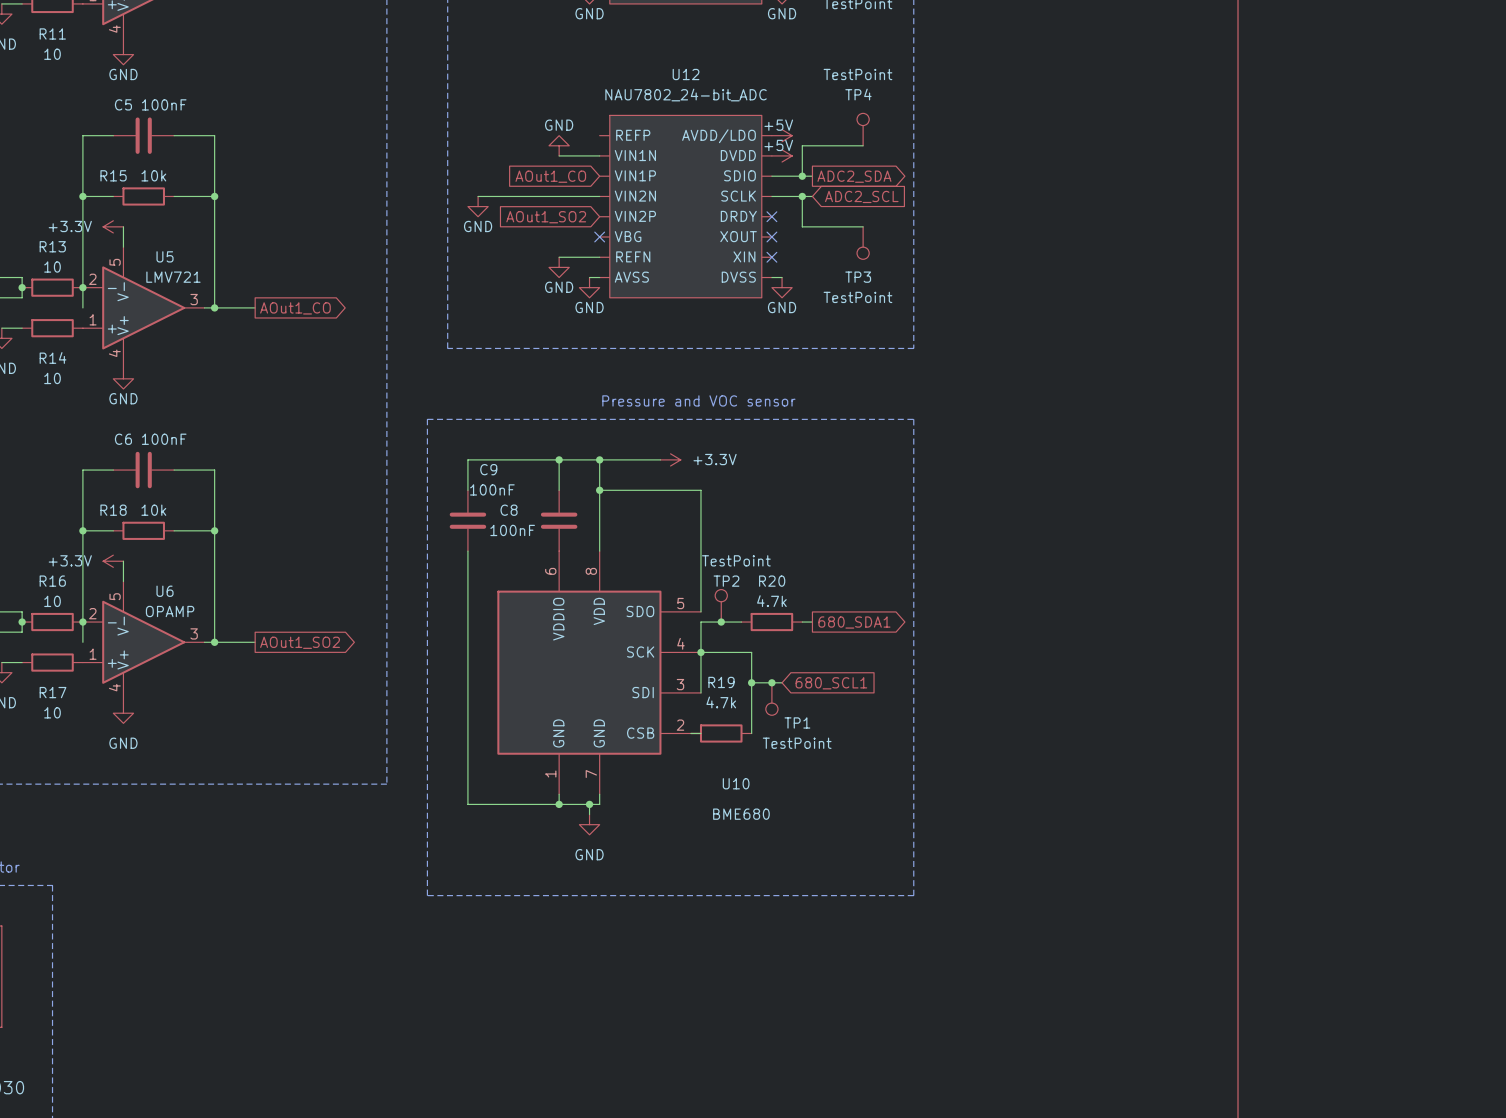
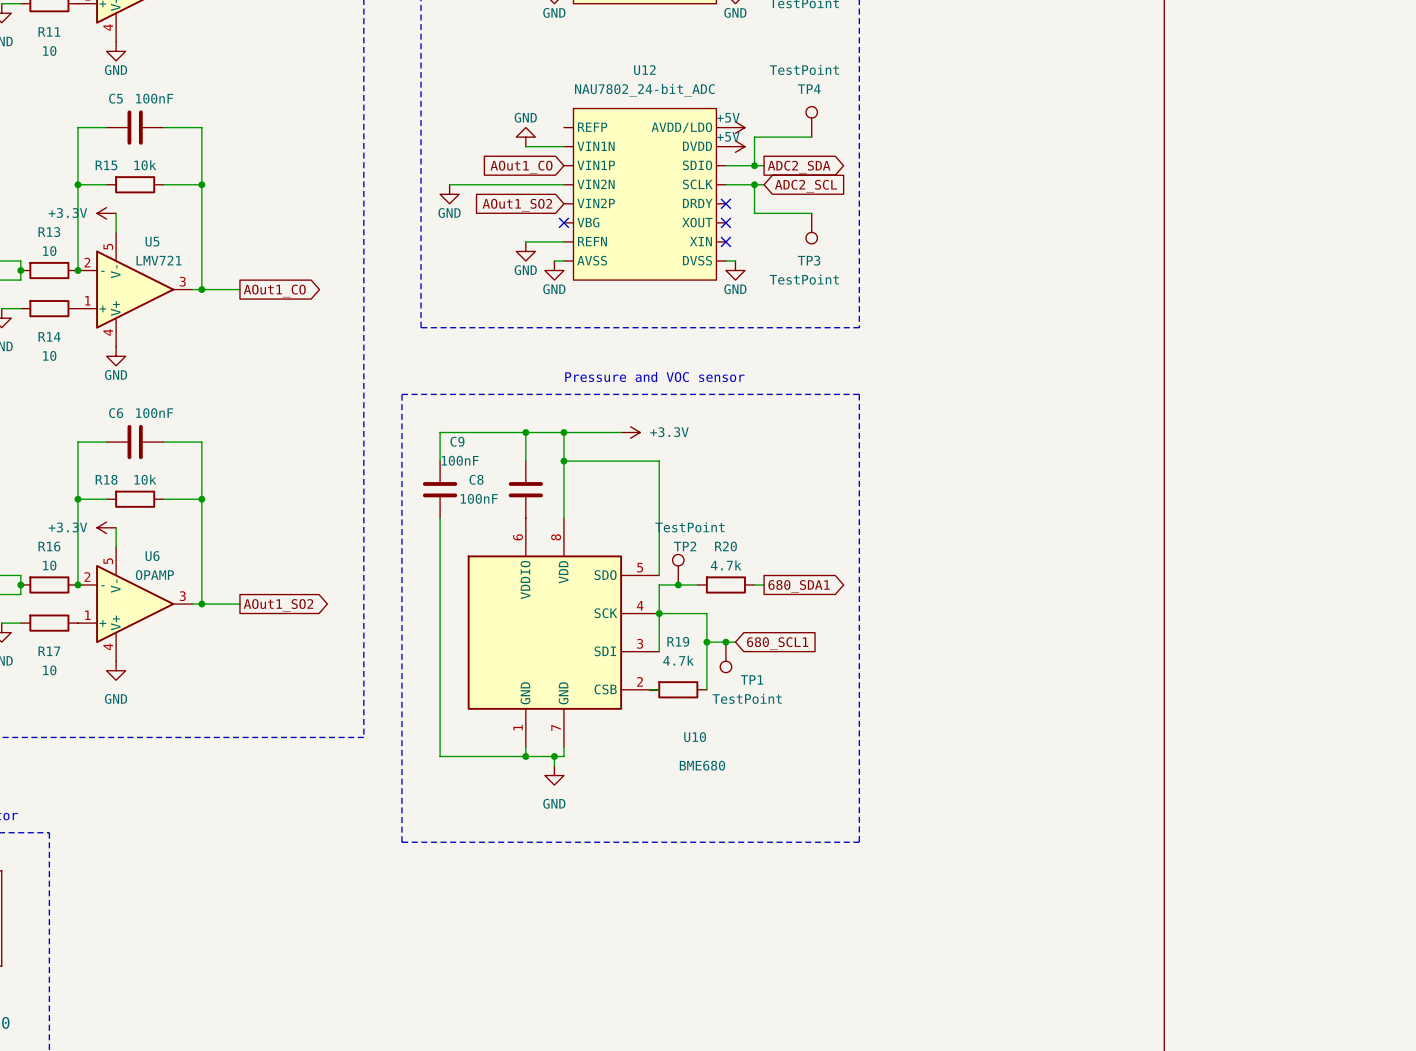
wire: (82, 287) (82, 307) -> none
wire: (82, 622) (82, 642) -> none

